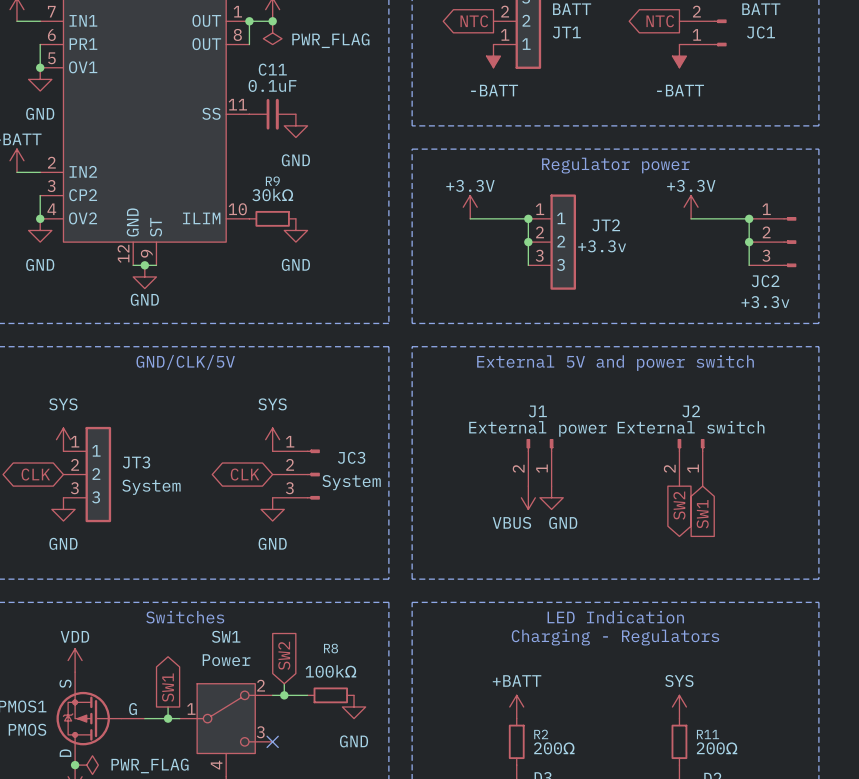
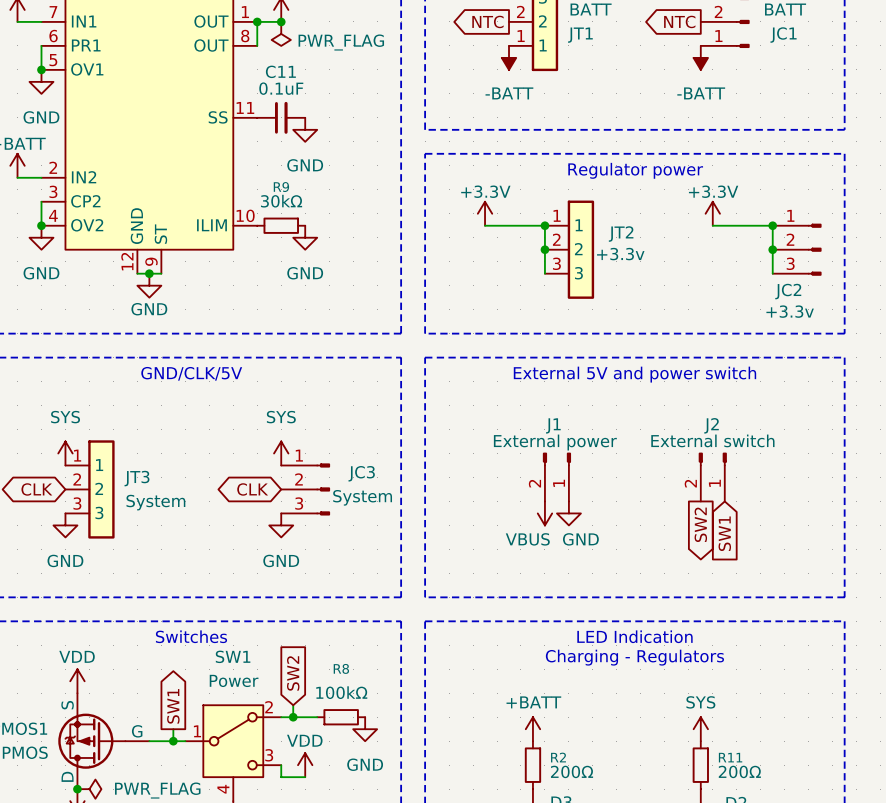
wire: none -> (281, 765) (281, 777) (305, 777)
no-connect mark: (272, 741) -> none
power symbol: none -> VDD (305, 765)

